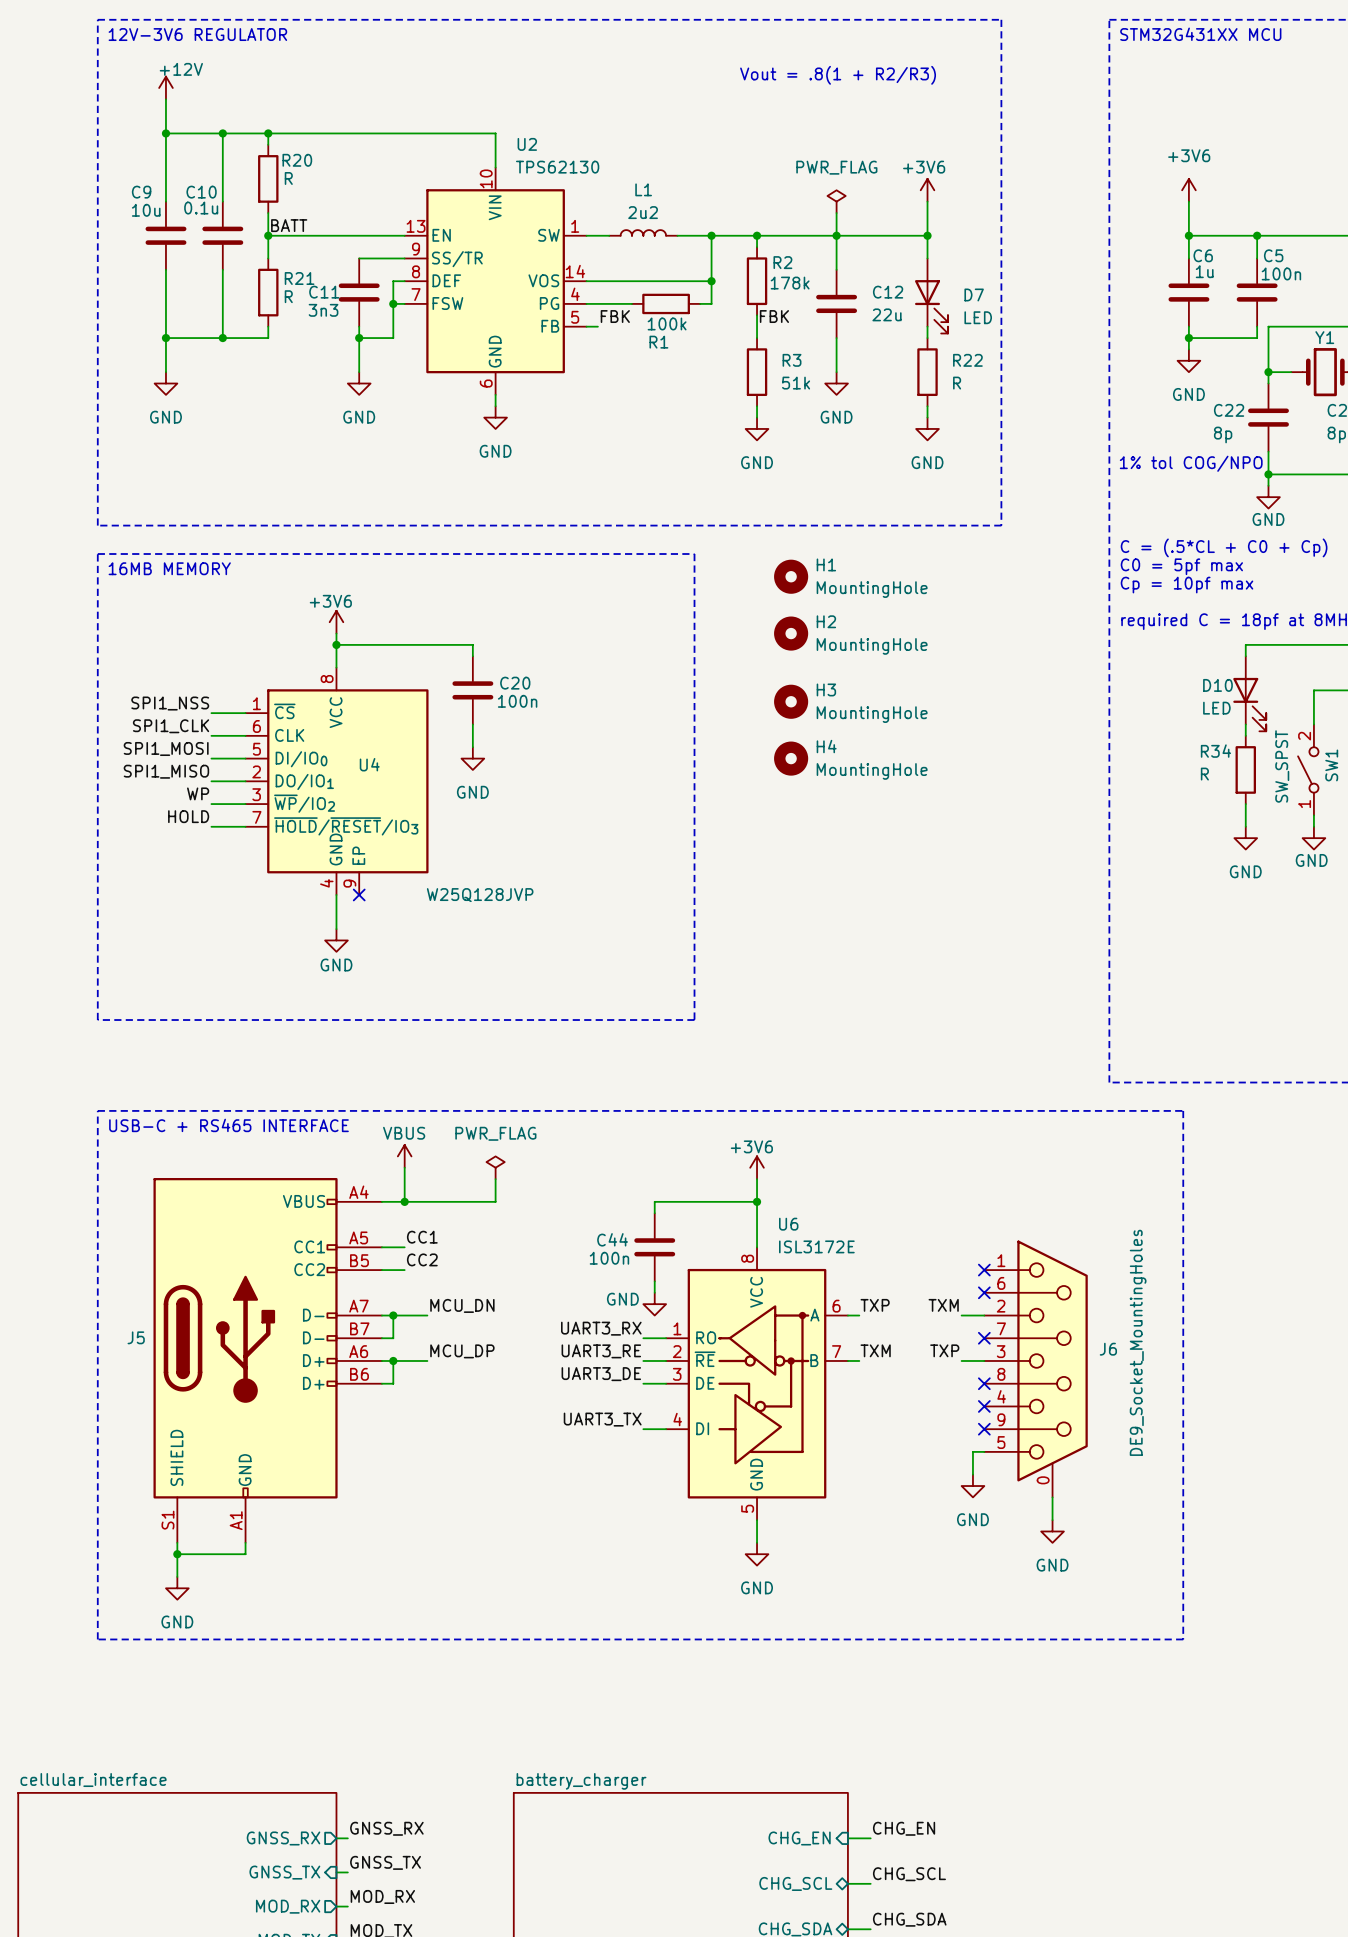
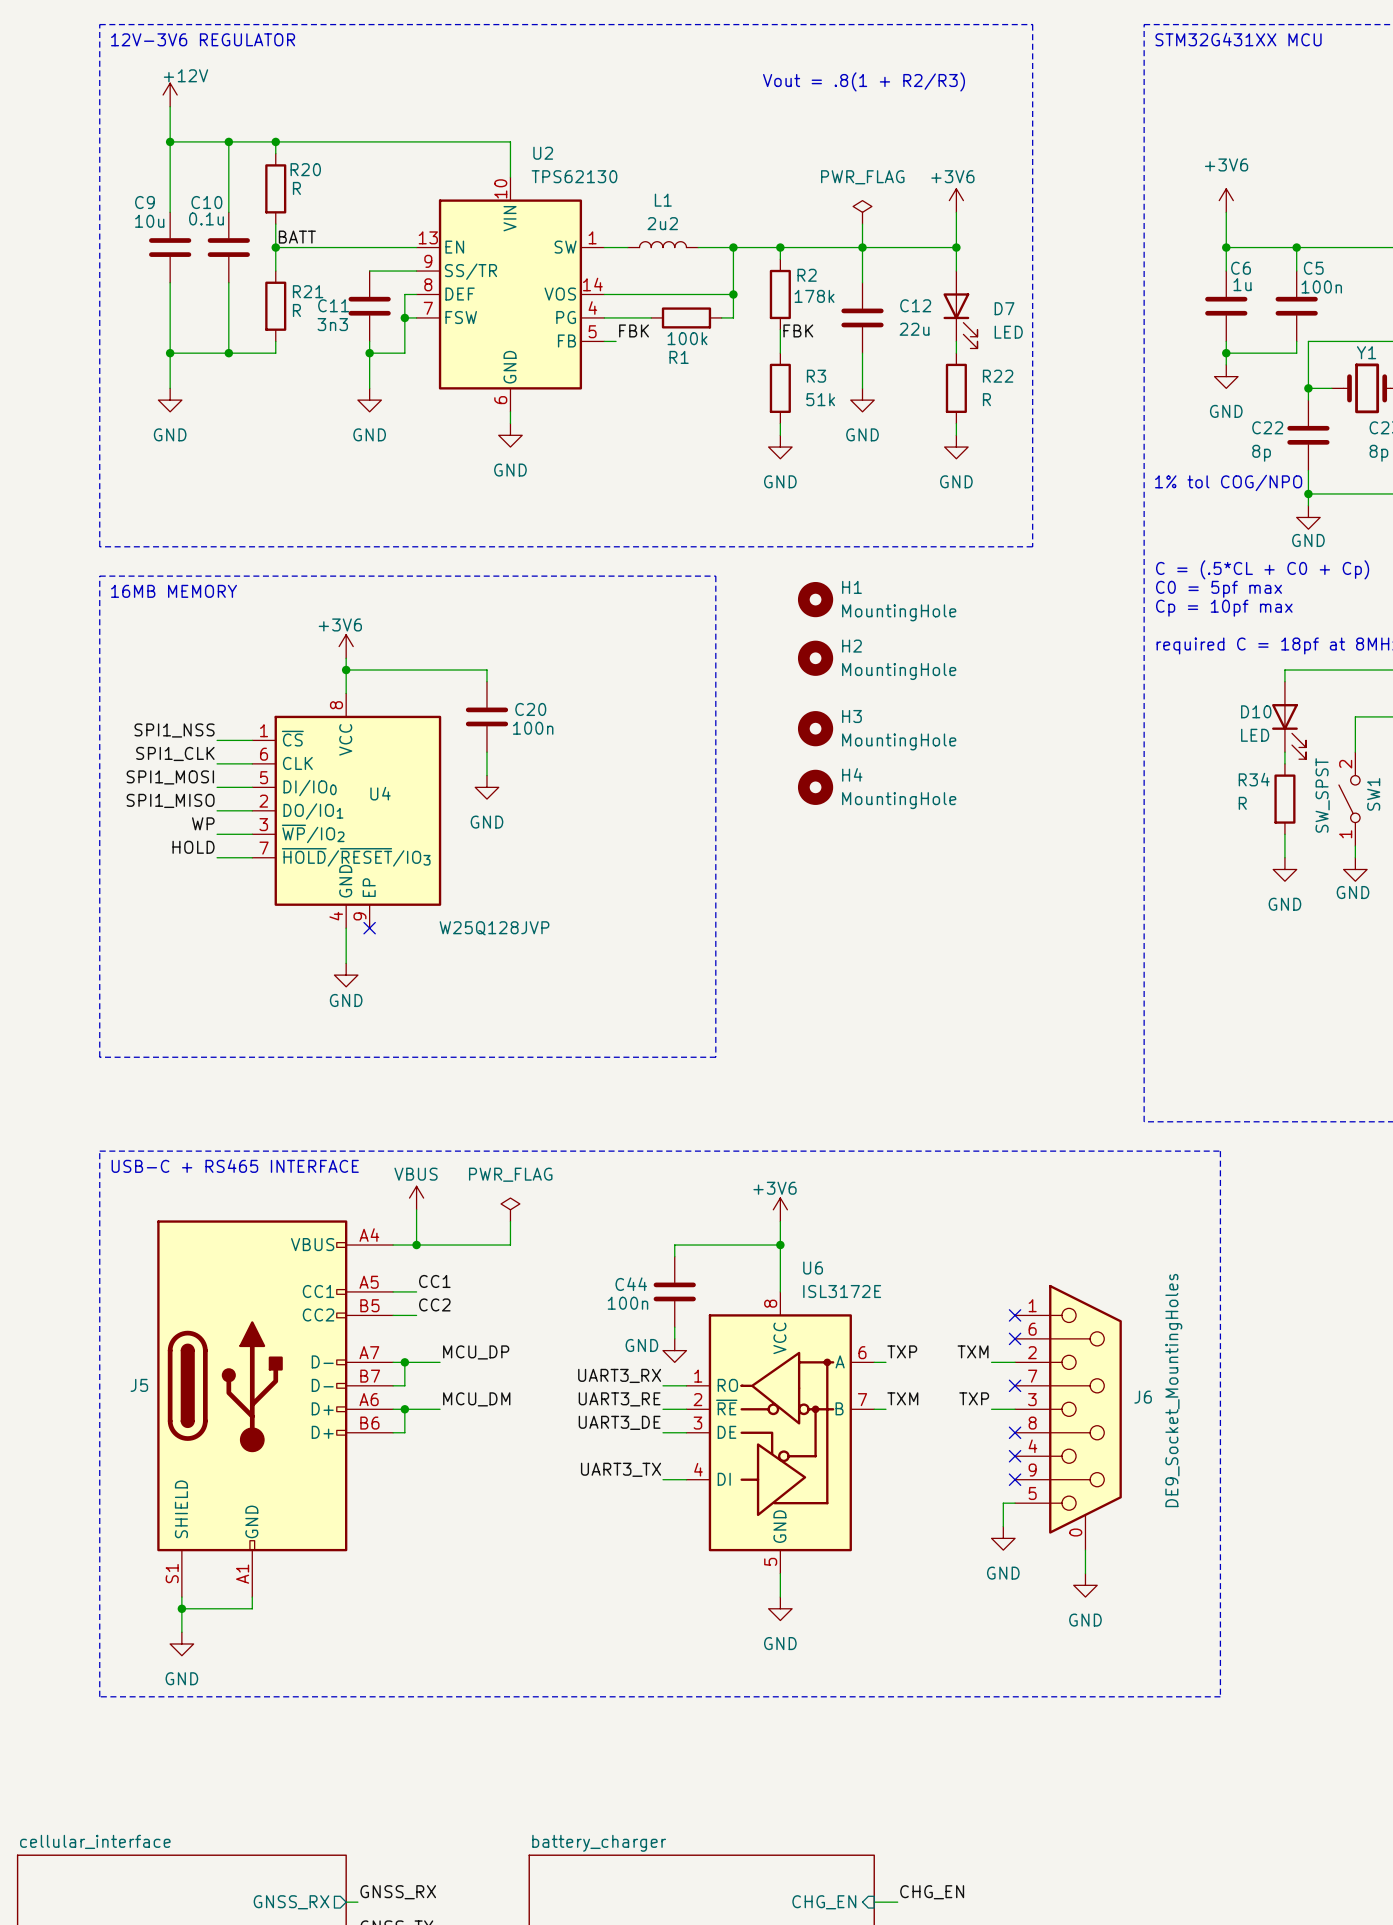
label: MCU_DN (462, 1305) -> MCU_DP (476, 1352)
label: MCU_DP (462, 1351) -> MCU_DM (476, 1399)

